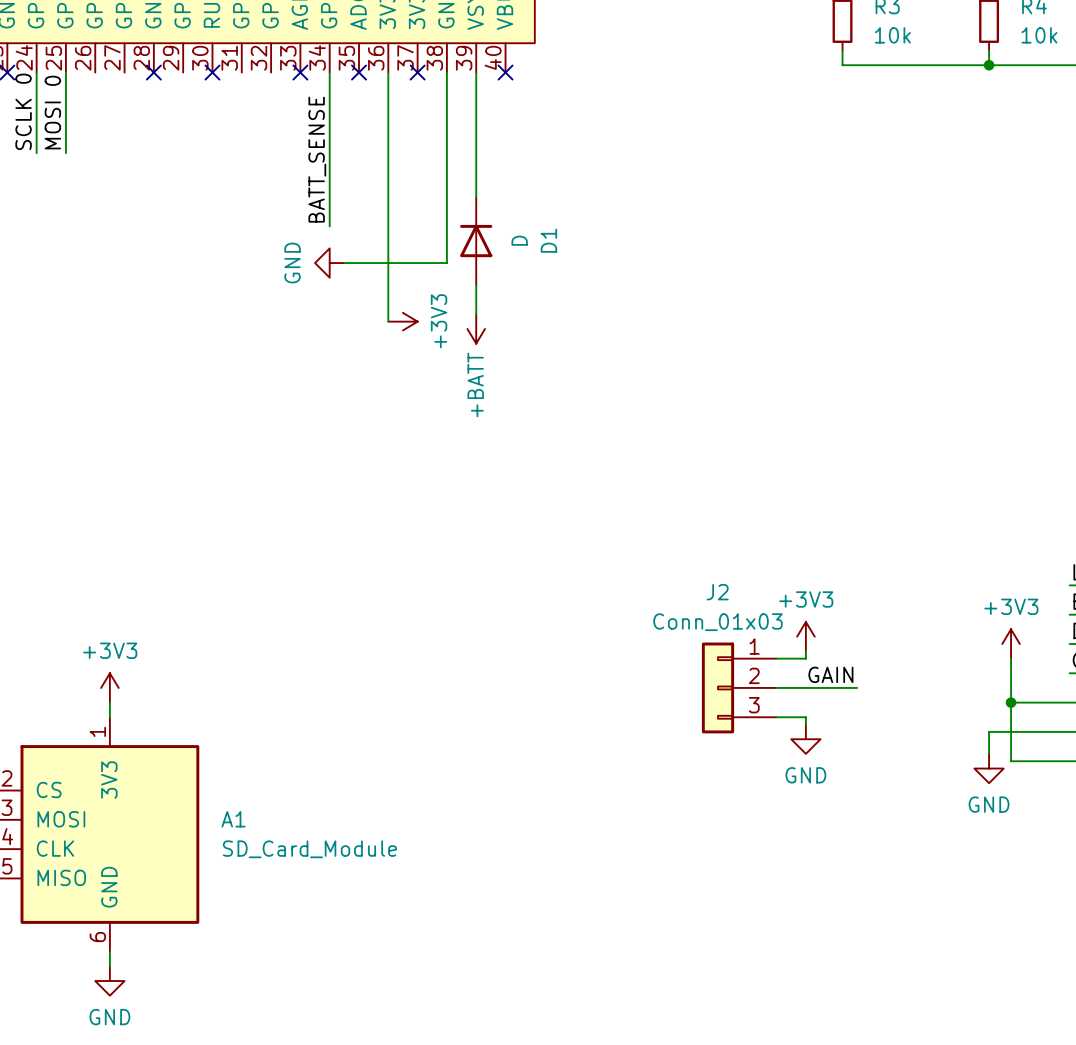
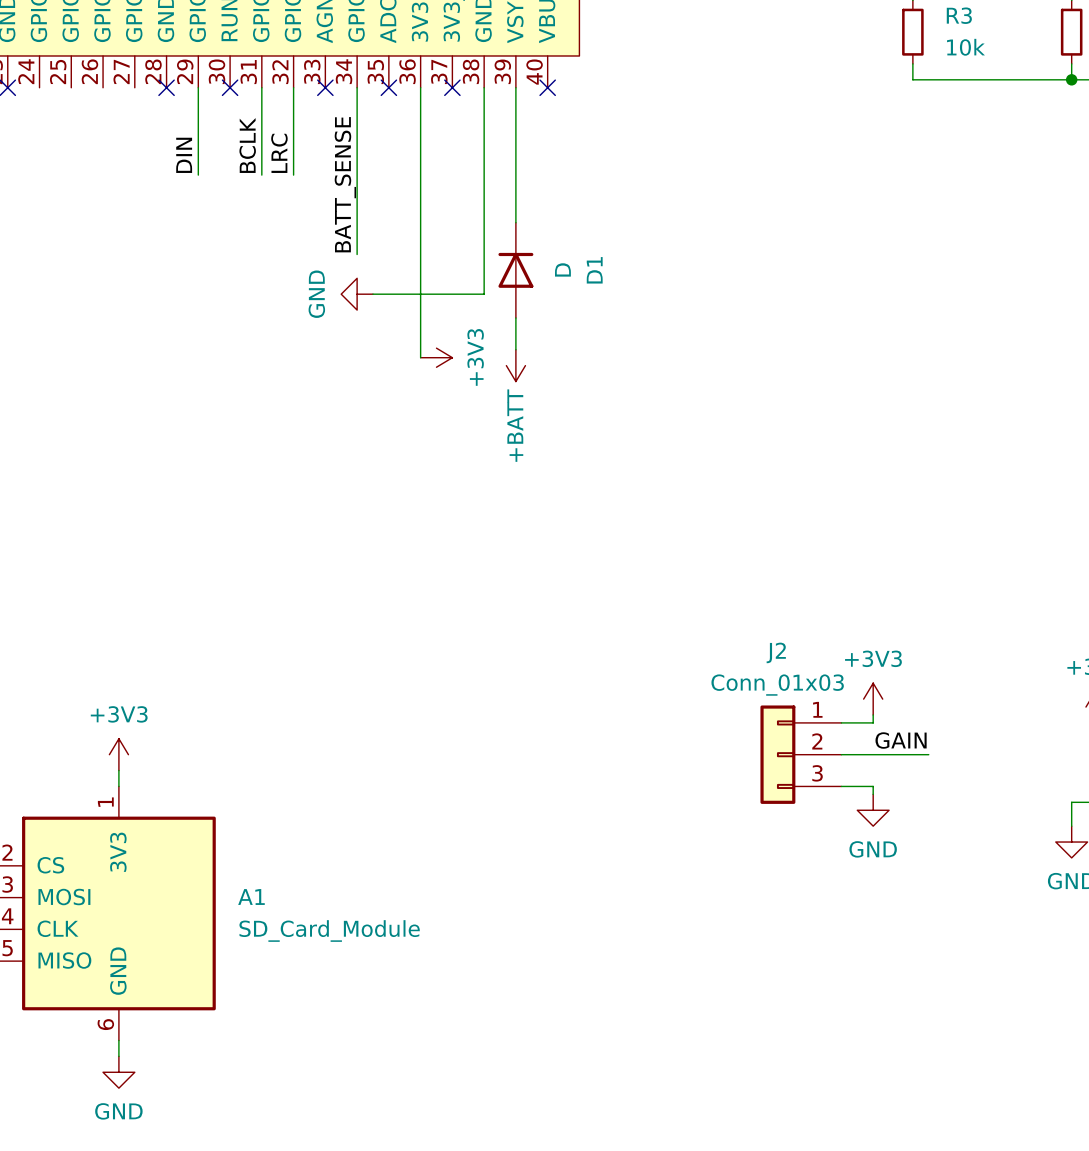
wire: (36, 72) (36, 153) -> (261, 87) (261, 175)
wire: (65, 72) (65, 153) -> (198, 87) (198, 175)
wire: none -> (293, 87) (293, 175)
label: SCLK 0 (23, 111) -> none
label: MOSI 0 (52, 112) -> none
label: none -> BCLK (247, 145)
label: none -> LRC (279, 153)
label: none -> DIN (184, 155)

